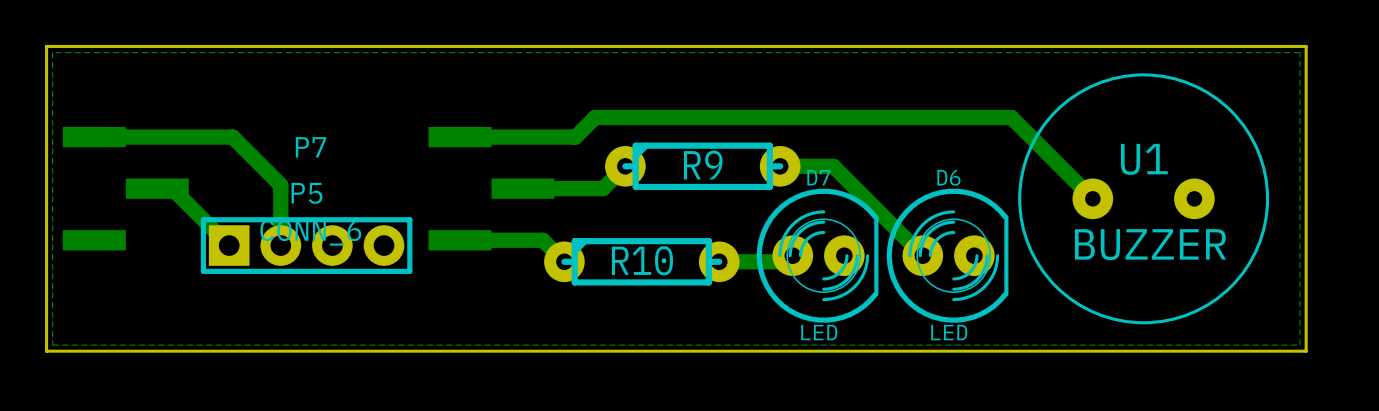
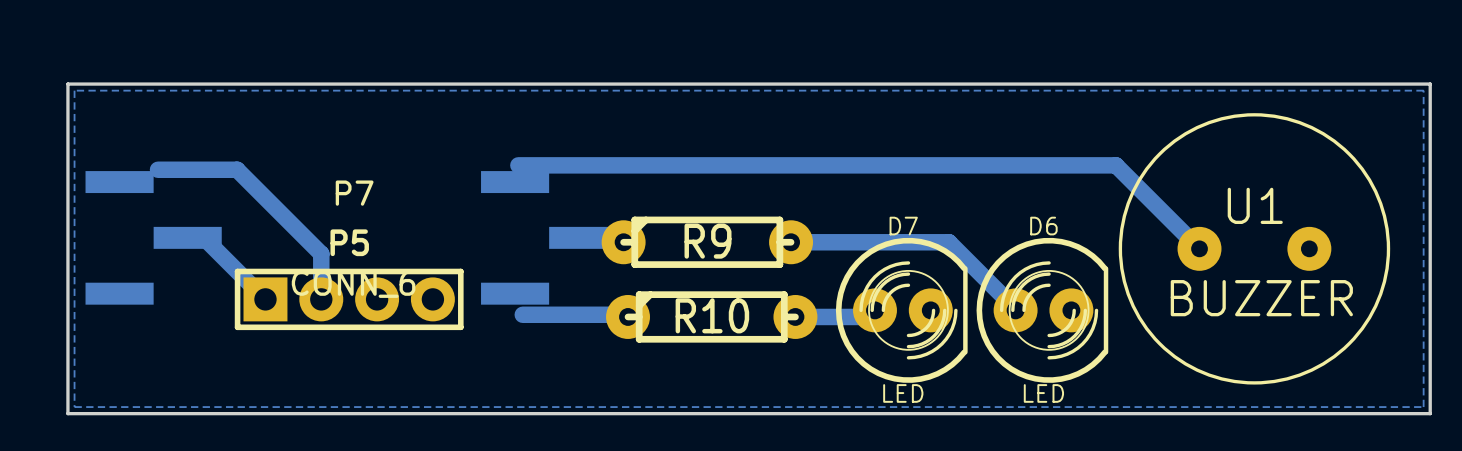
bottom track: (1015, 121) (1011, 117) (595, 117) (575, 137) (459, 137) -> (1116, 165) (518, 165)
bottom track: (94, 137) (232, 137) (280, 185) (280, 203) -> (158, 169) (237, 169) (321, 253)
bottom track: (625, 166) (603, 188) (522, 188) -> none
R9 position: (702, 166) -> (707, 242)
bottom track: (780, 166) (833, 166) (922, 255) -> (791, 242) (949, 242) (1015, 310)
bottom track: (459, 240) (542, 240) (564, 261) -> none
bottom track: none -> (522, 314) (623, 314)

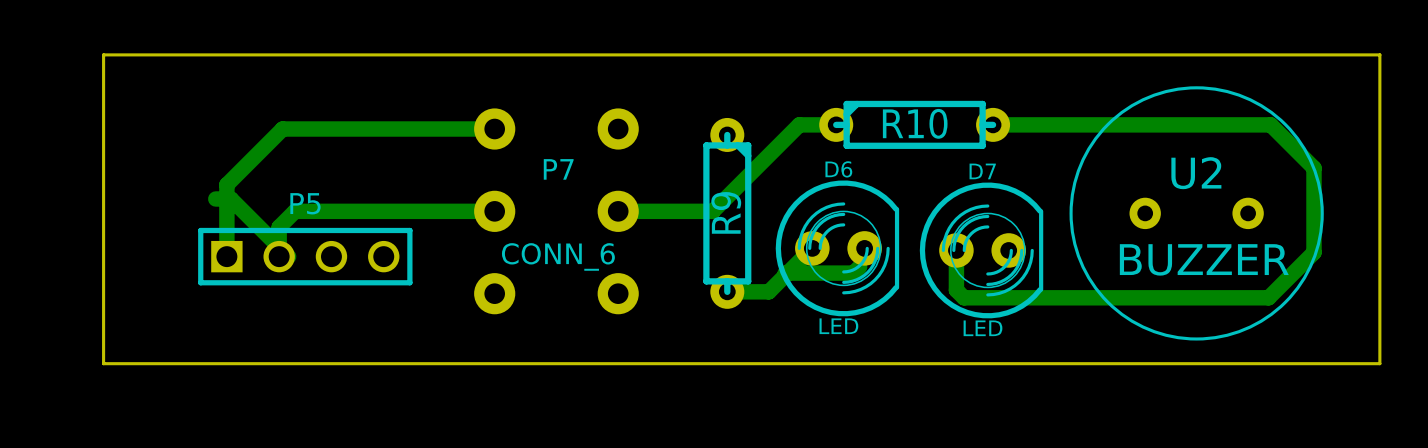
bottom zone outline: (74, 90) (74, 407) (1423, 407) (1423, 90) (74, 90) -> none
bottom track: none -> (836, 124) (799, 124) (712, 211) (618, 211)
bottom track: none -> (993, 124) (1270, 124) (1313, 168) (1313, 252) (1268, 297) (964, 297) (956, 290) (956, 250)
bottom track: none -> (494, 129) (282, 129) (226, 184) (226, 256)
bottom track: (518, 165) (1116, 165) (1199, 248) -> none
bottom track: (158, 169) (237, 169) (321, 253) (321, 299) -> none
P7 footprint: [85, 171, 618, 305] -> [474, 108, 639, 315]
R9 footprint: [601, 216, 814, 268] -> [703, 117, 752, 309]
D7 footprint: [835, 237, 968, 383] -> [919, 182, 1044, 319]
D6 footprint: [976, 237, 1109, 383] -> [775, 180, 900, 317]
bottom track: (791, 242) (949, 242) (1015, 310) -> none
U1: BUZZER (1254, 248) -> none
bottom track: none -> (494, 211) (295, 211) (279, 227) (279, 256)
U2: none -> BUZZER (1196, 213)
P5 footprint: [234, 268, 464, 331] -> [198, 227, 413, 286]
bottom track: none -> (812, 248) (768, 291) (727, 291)
R10 footprint: [606, 291, 818, 343] -> [819, 100, 1011, 149]
bottom track: (522, 314) (623, 314) -> none

